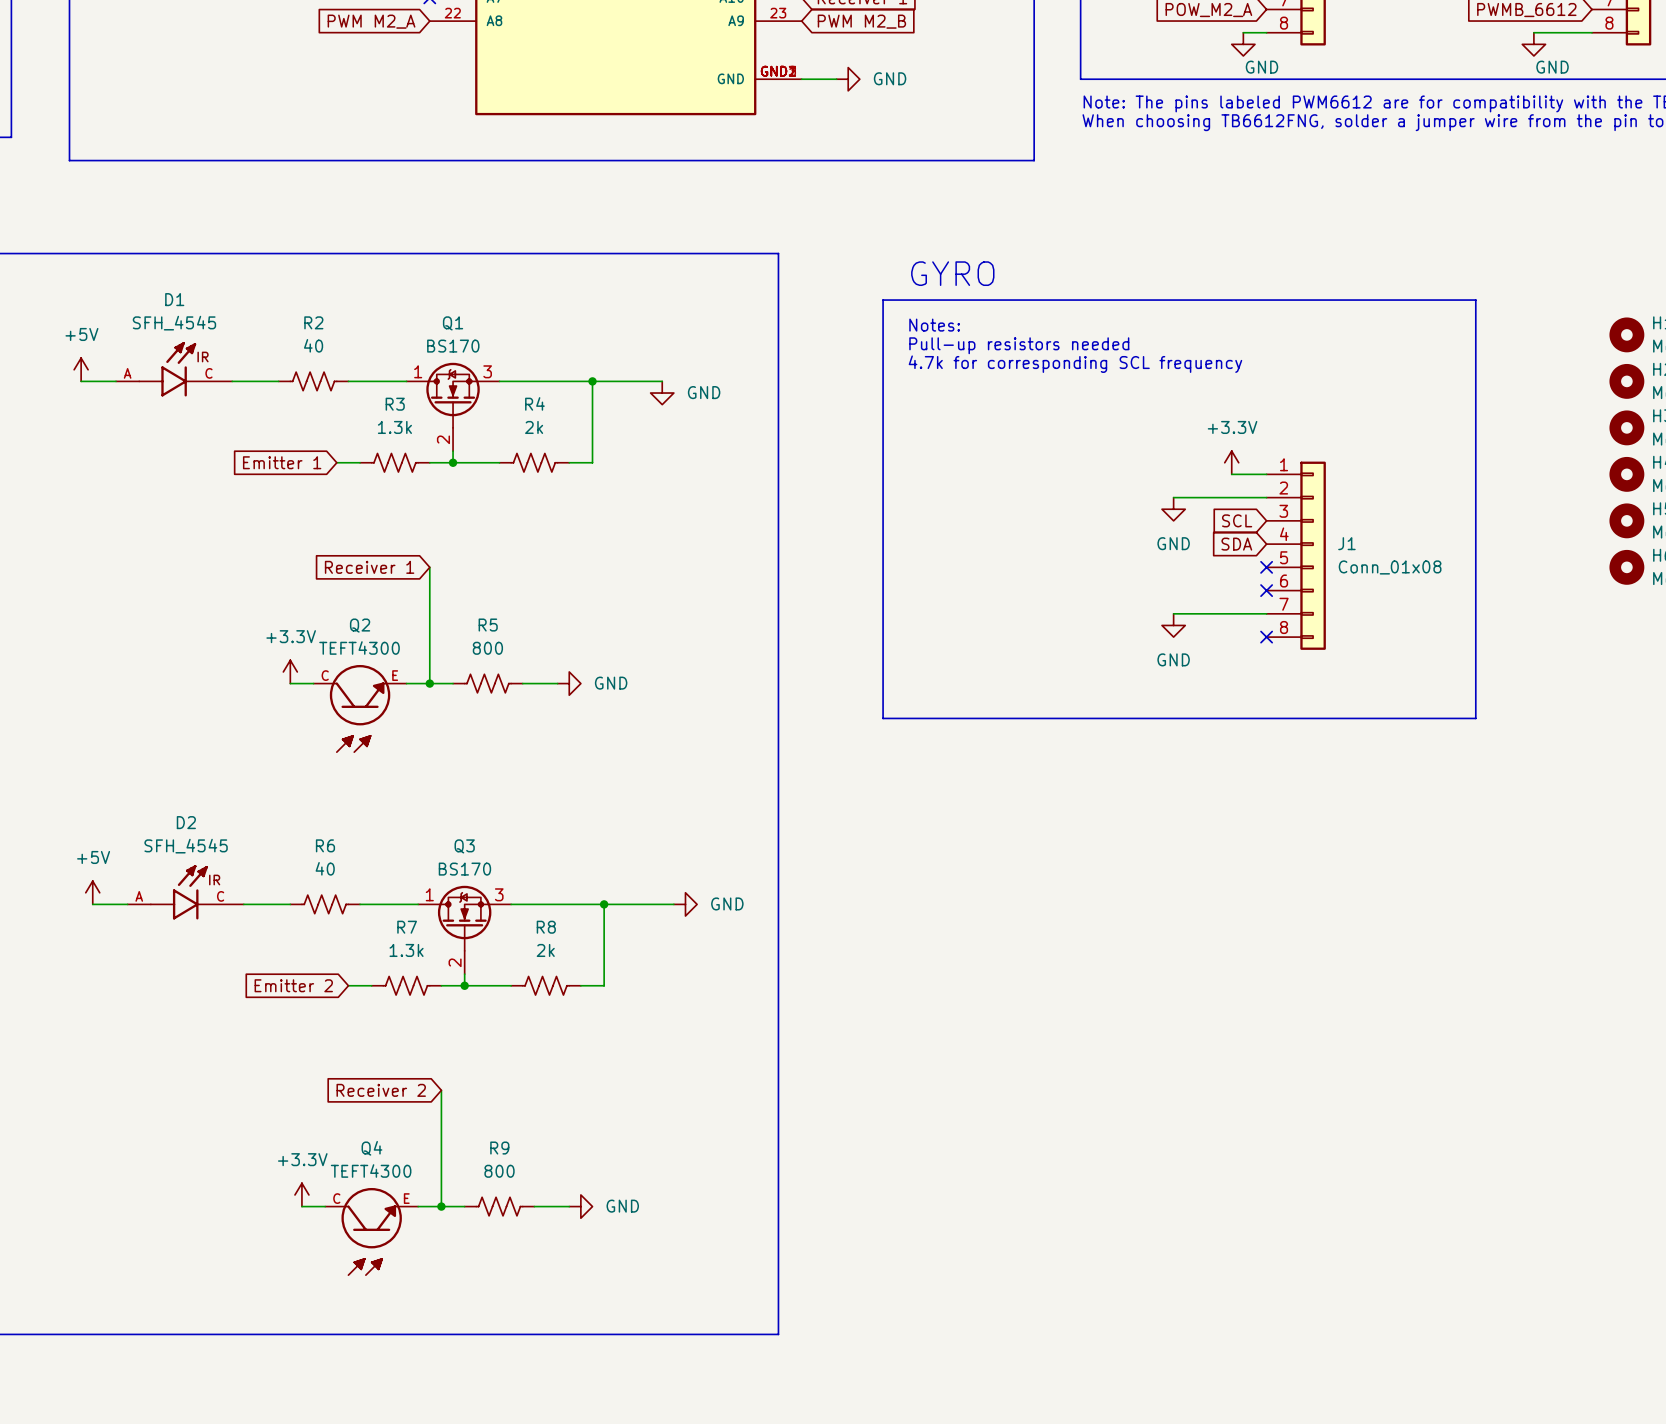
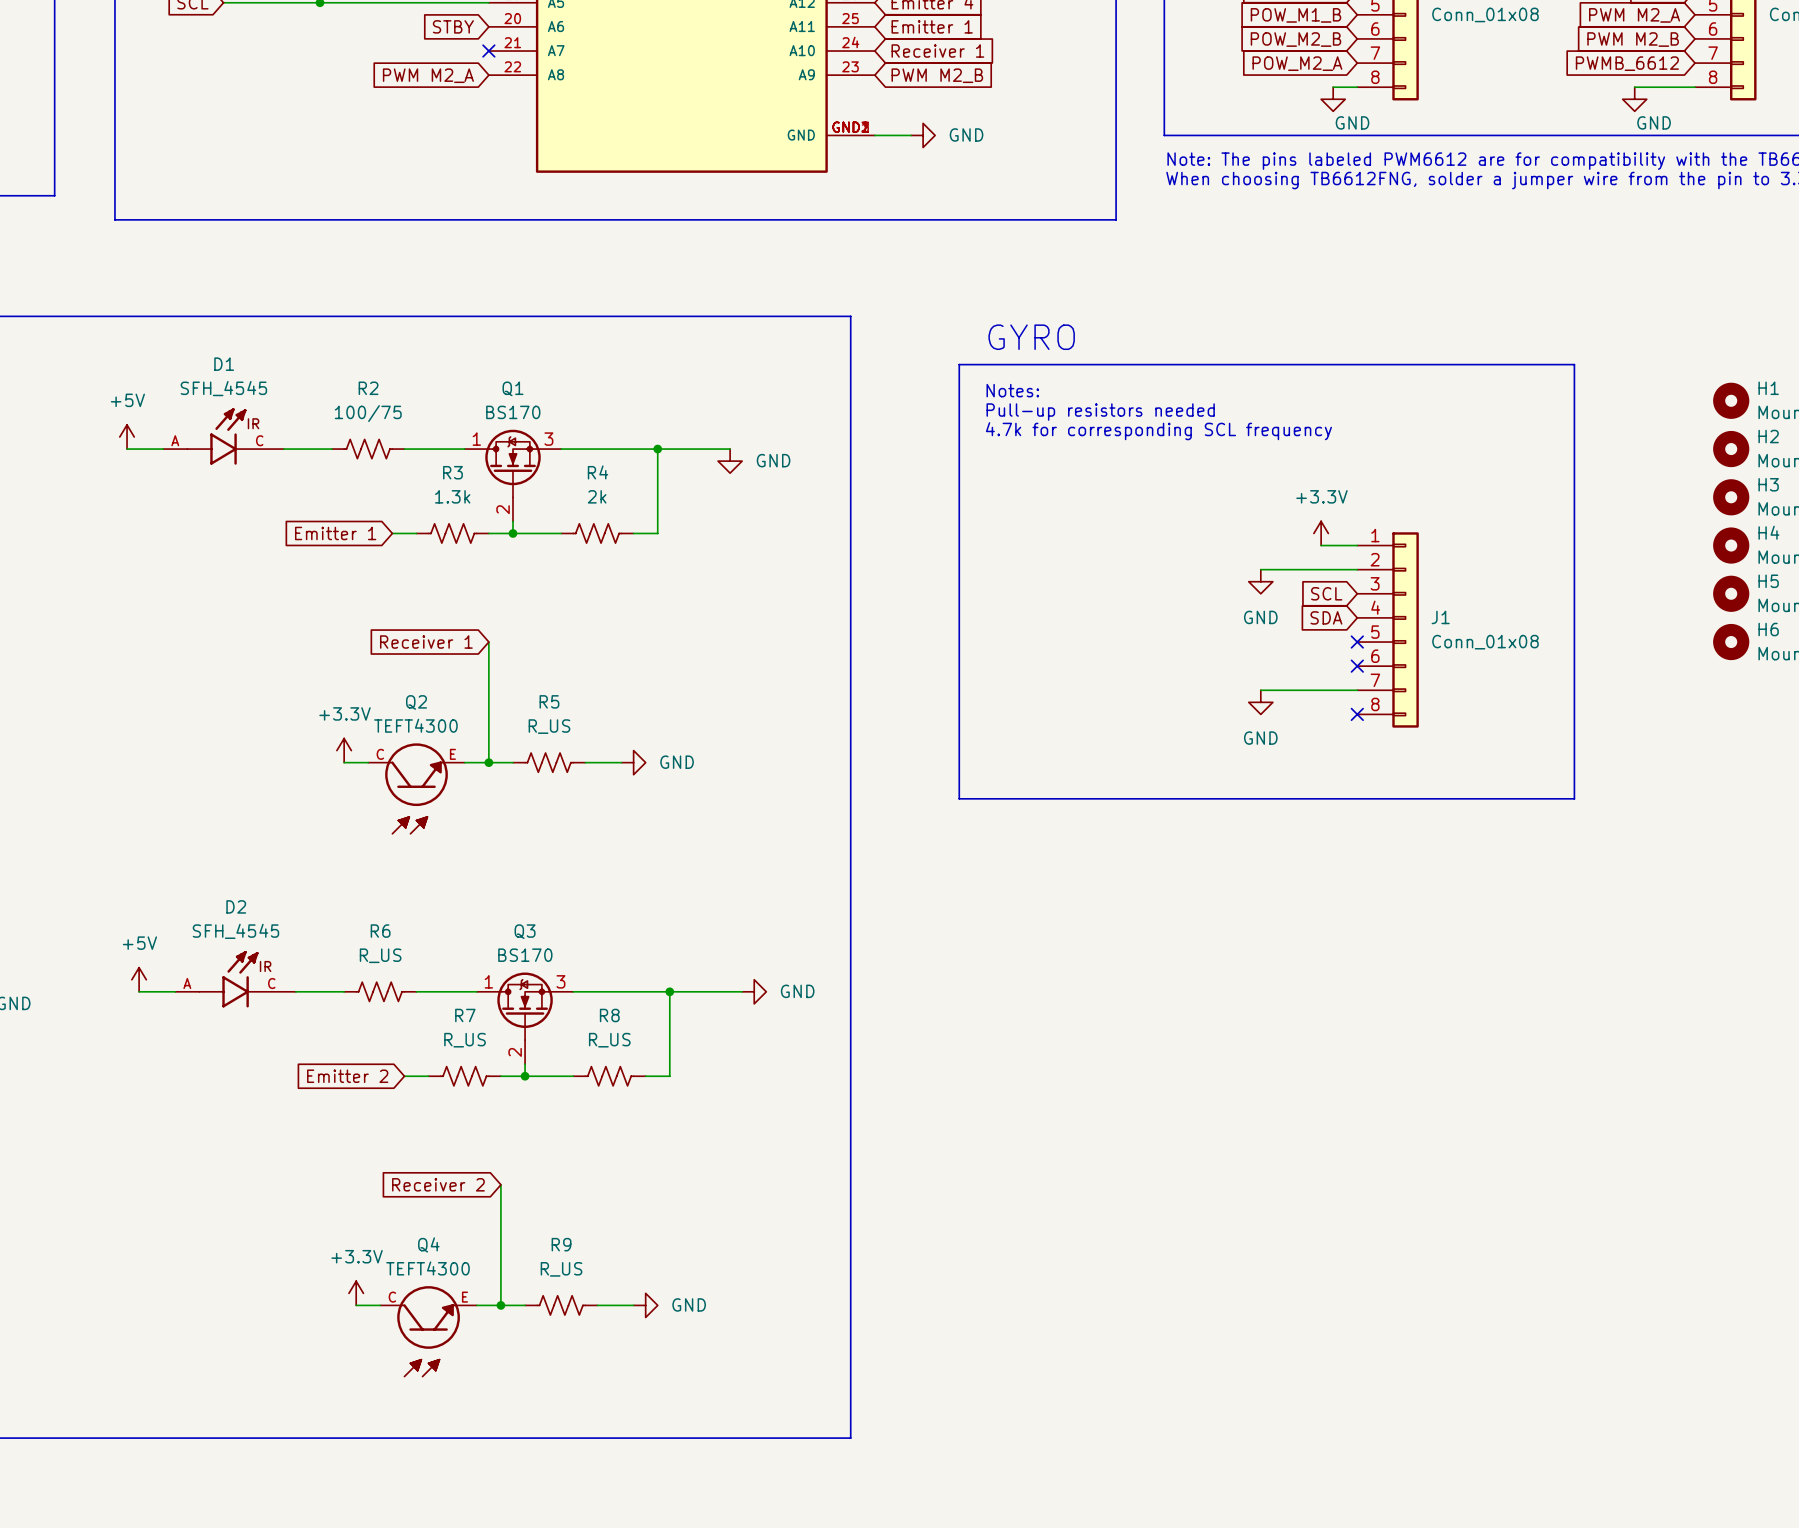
R2 value: 40 (313, 345) -> 100/75 (368, 413)
R5 value: 800 (487, 648) -> R_US (549, 726)
R6 value: 40 (325, 868) -> R_US (380, 955)
R7 value: 1.3k (406, 950) -> R_US (465, 1040)
R8 value: 2k (545, 950) -> R_US (609, 1040)
R9 value: 800 (499, 1171) -> R_US (561, 1269)

